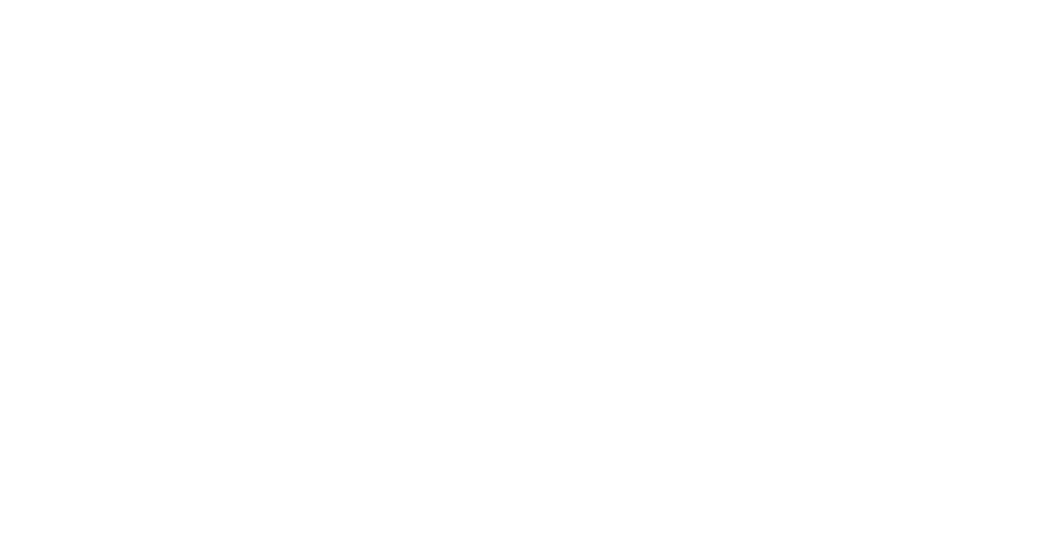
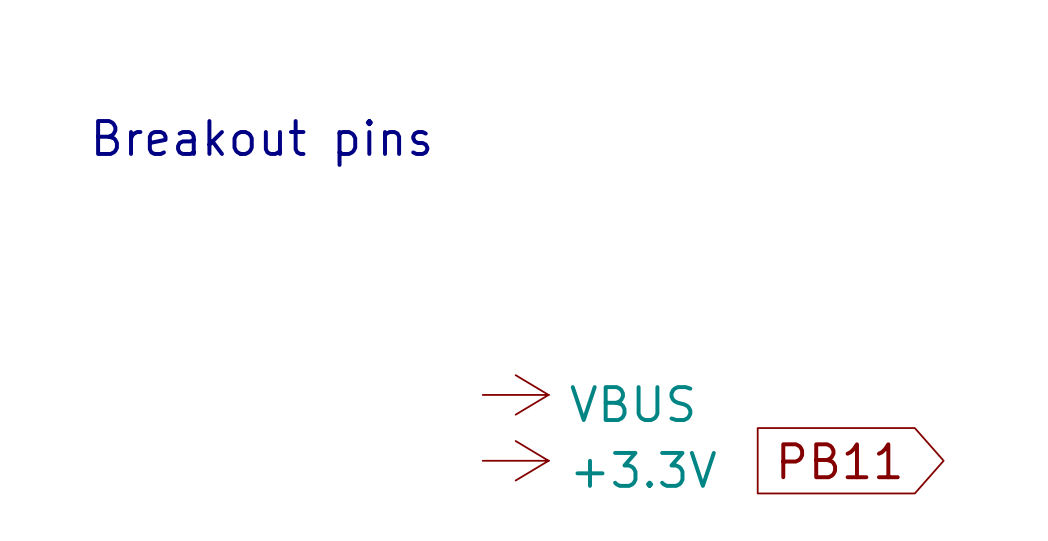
text: none -> Breakout pins (262, 142)
power symbol: none -> VBUS (515, 394)
power symbol: none -> +3.3V (515, 460)
global label: none -> PB11 (840, 460)

